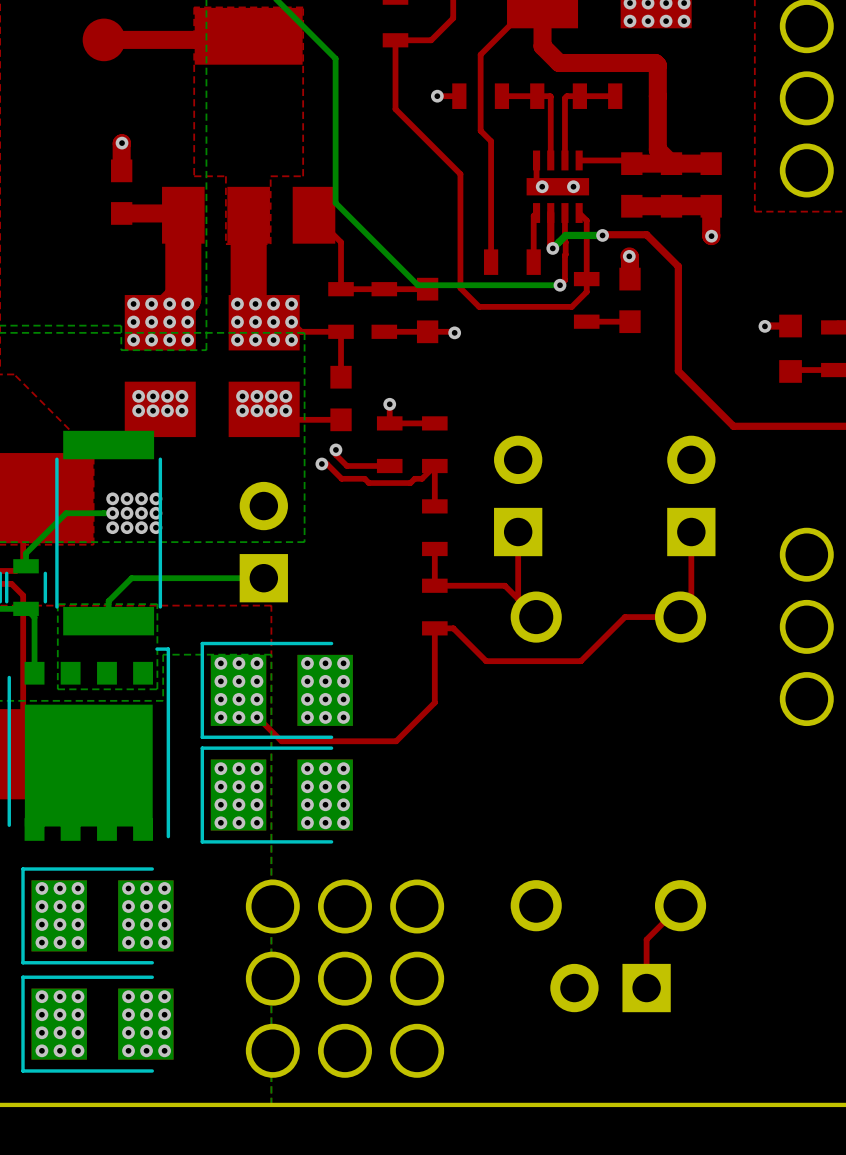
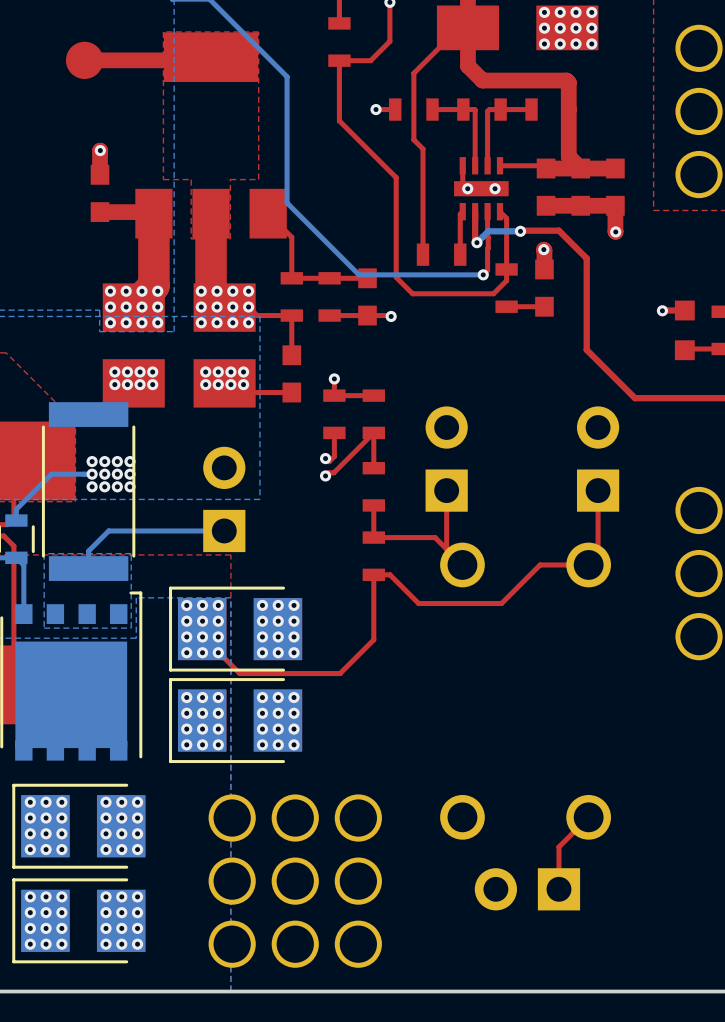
top track: (335, 449) (335, 454) (346, 466) (389, 466) -> (325, 458) (329, 461) (334, 456) (334, 432)
via: (335, 449) -> none
top track: (321, 463) (326, 463) (341, 478) (364, 478) (368, 483) (410, 483) (414, 478) (422, 478) -> (325, 475) (328, 472) (333, 472) (362, 444)
via: (321, 463) -> none
via: none -> (325, 458)
via: none -> (325, 475)

